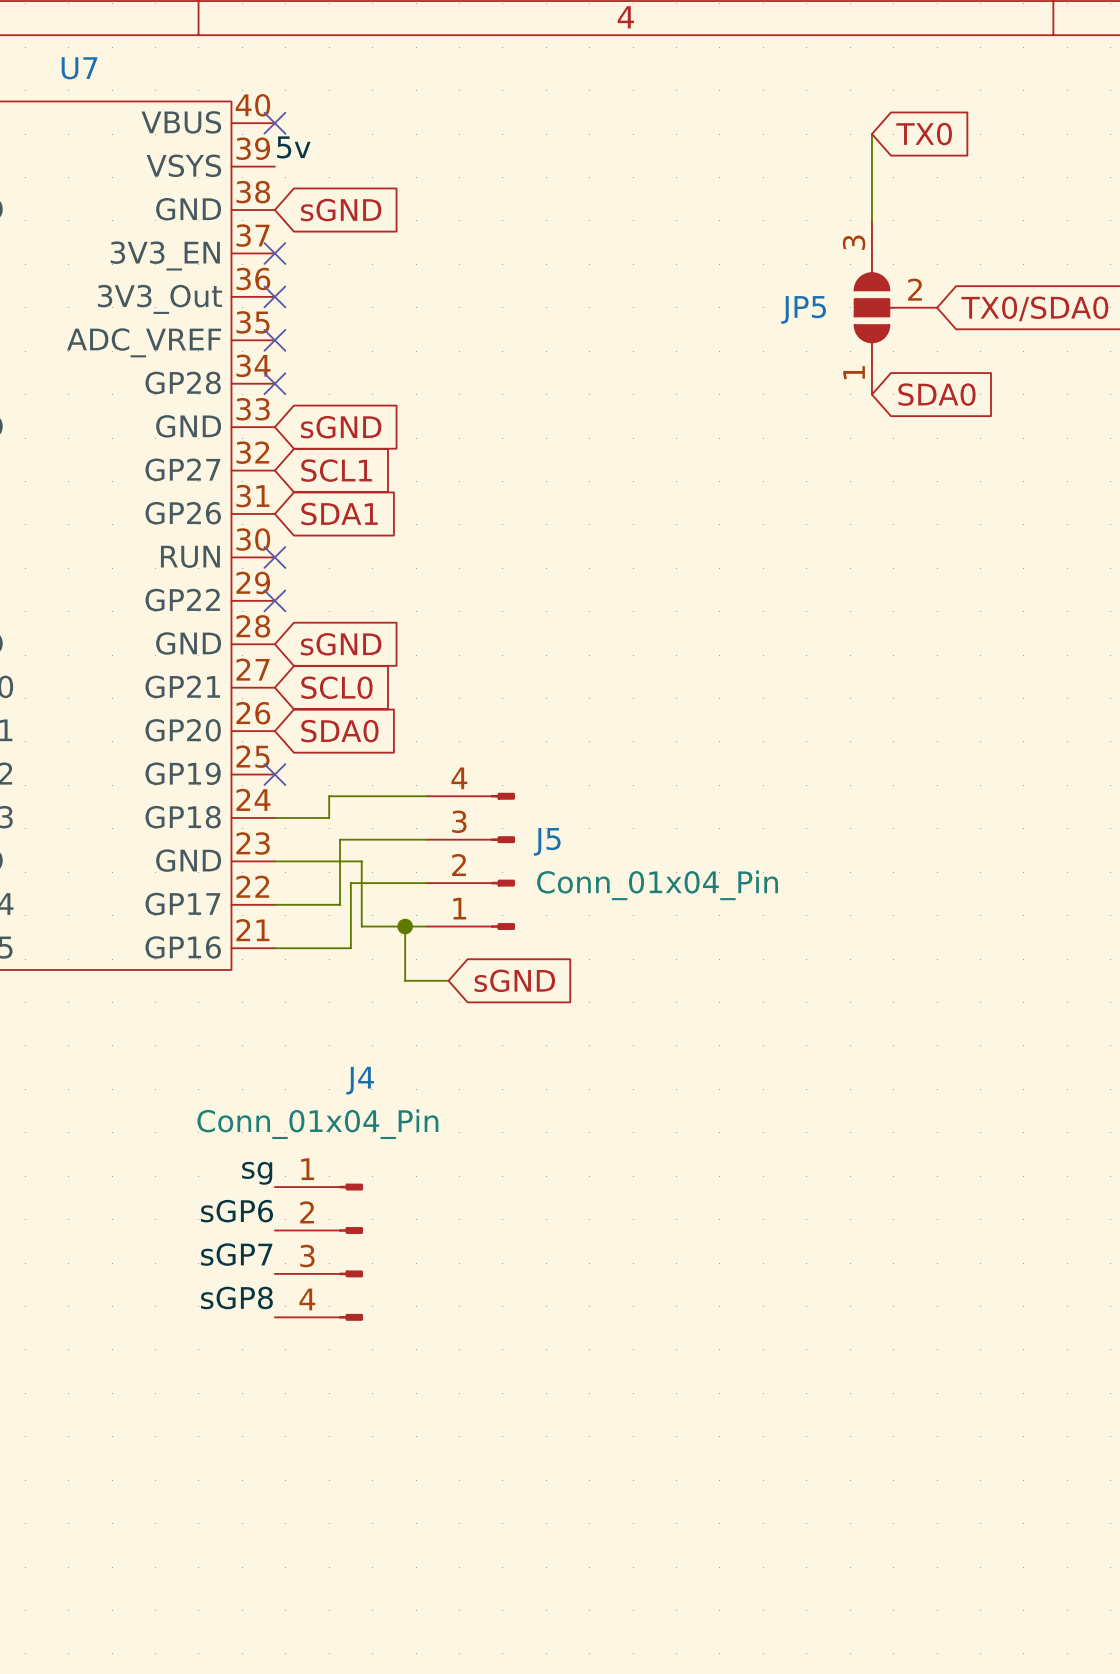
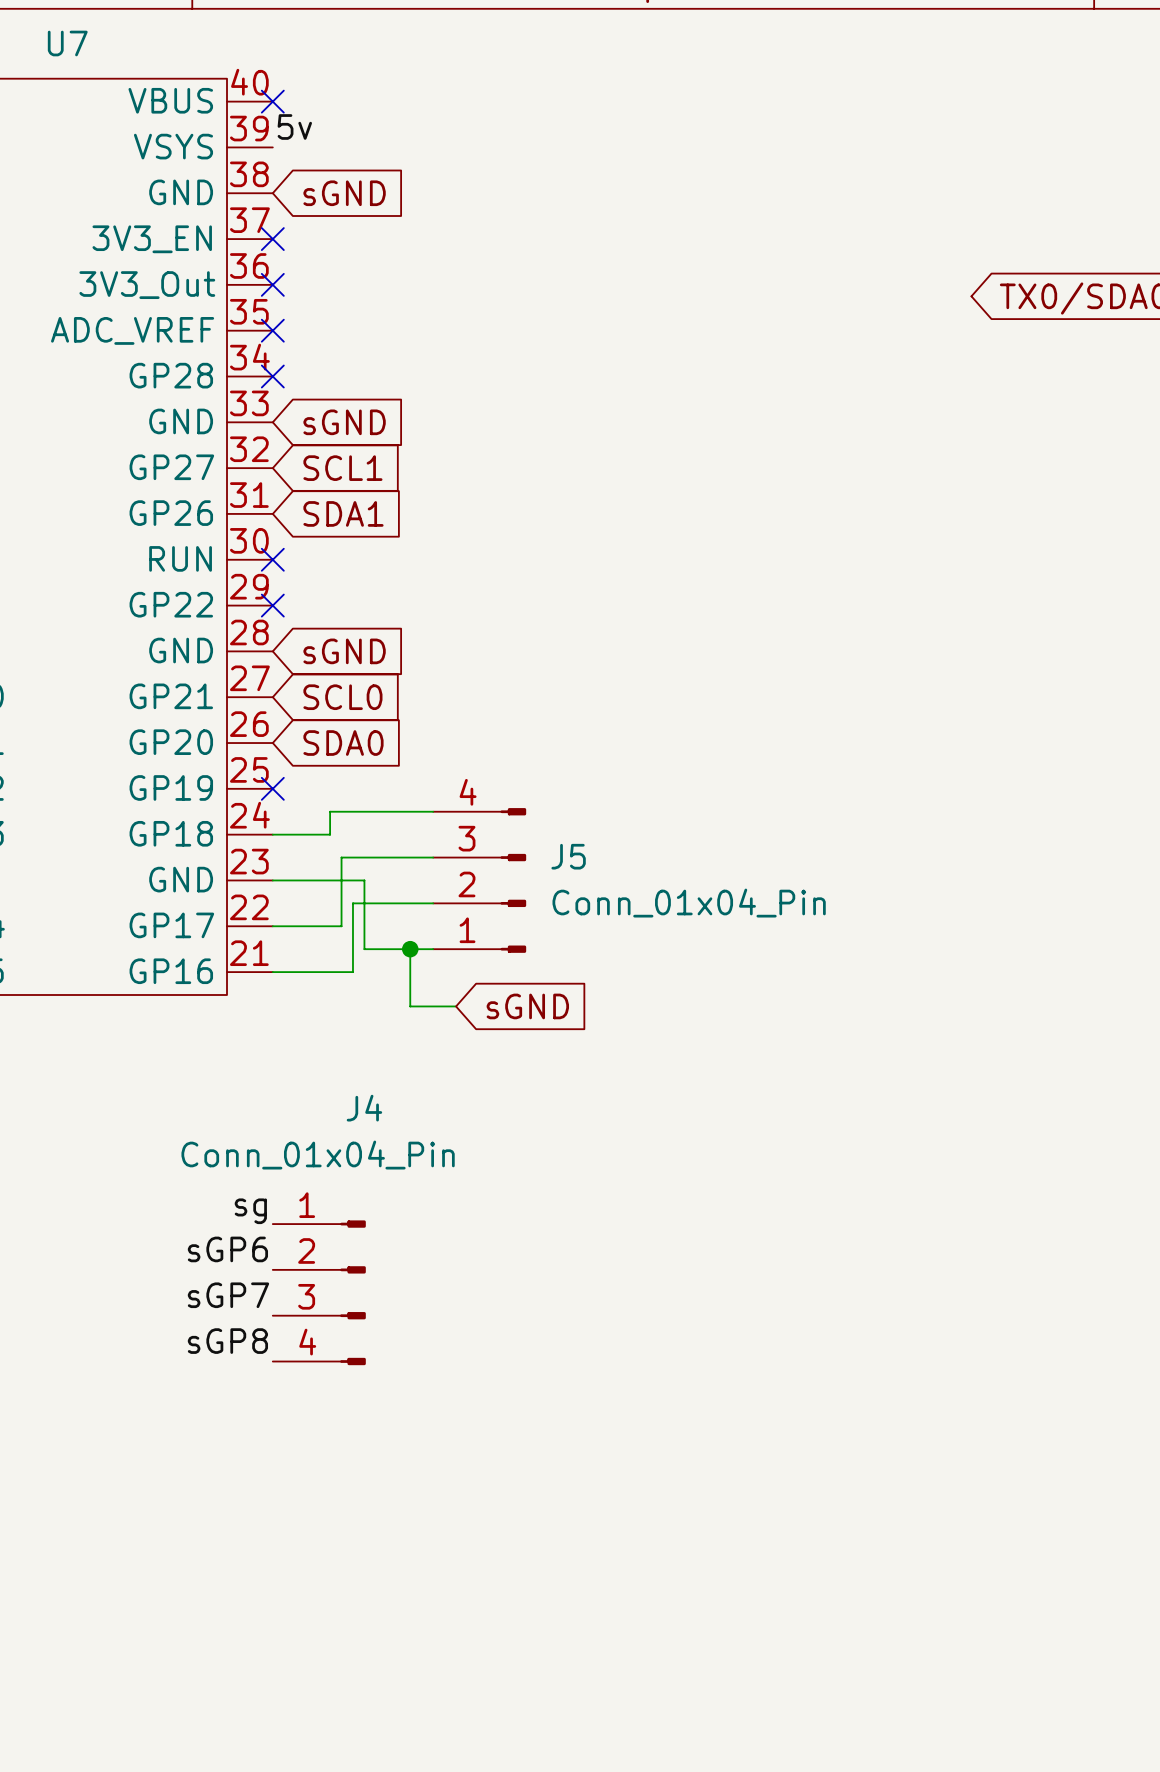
wire: (871, 134) (871, 220) -> none
global label: TX0 (924, 134) -> none
JP5: (895, 307) -> none
global label: SDA0 (936, 394) -> none

